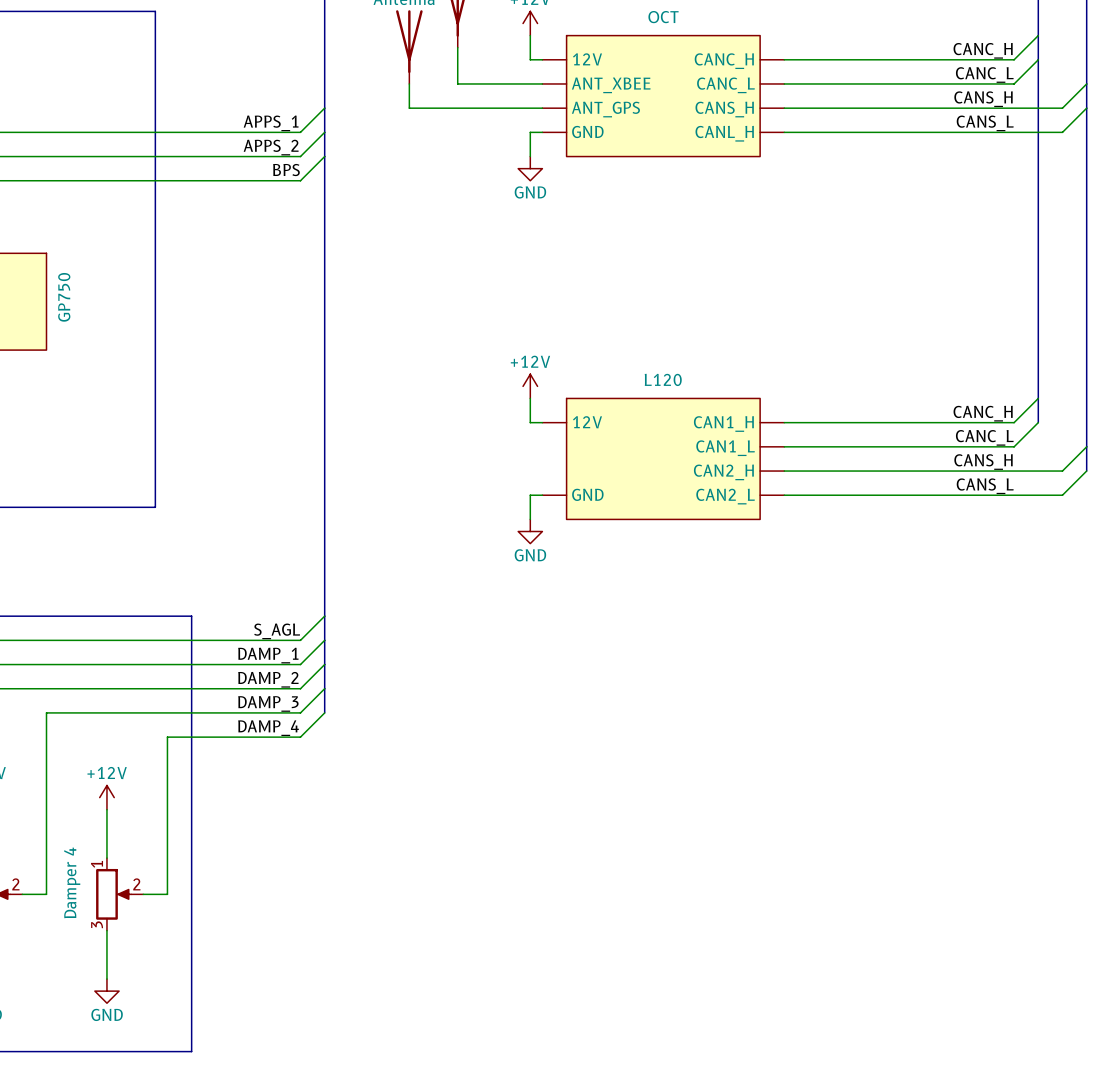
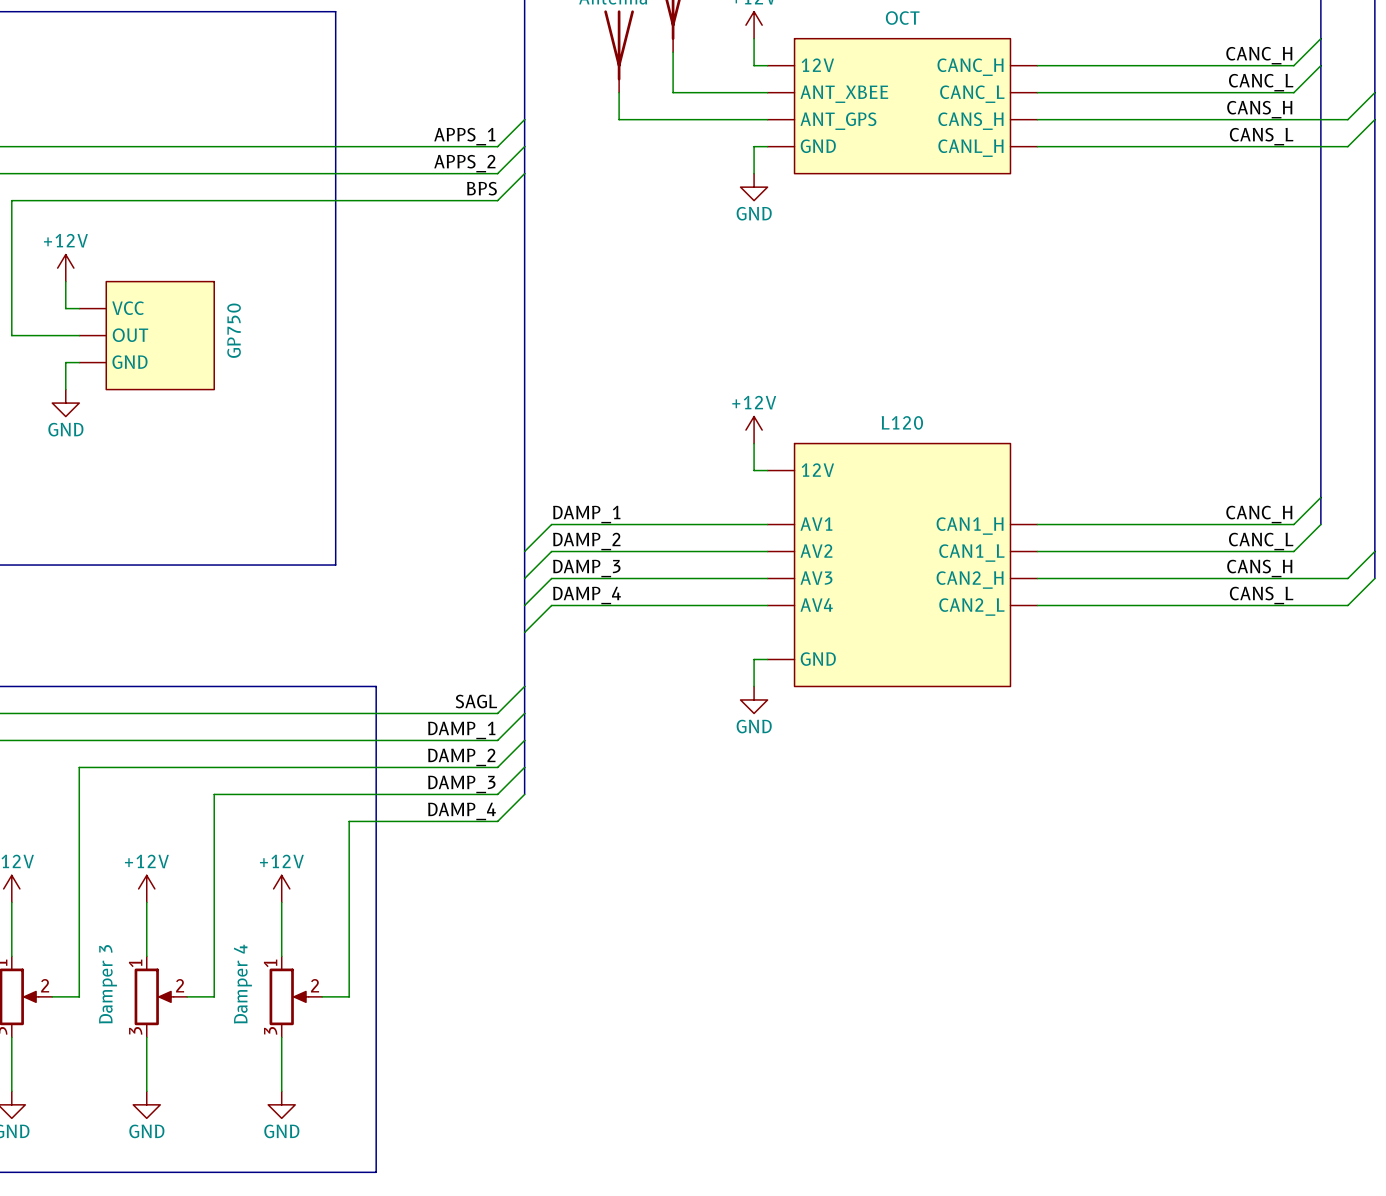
wire: (1038, 398) (1014, 422) (784, 422) -> none
label: CANC_H (983, 413) -> none
wire: (1038, 422) (1014, 446) (784, 446) -> none
bus: none -> (1320, 470) (1320, 524)
label: CANC_L (984, 437) -> none
wire: (1086, 446) (1062, 471) (1014, 471) -> (1320, 497) (1293, 524)
part: L120 (663, 458) -> none
label: none -> DAMP_1 (586, 514)
label: CANS_H (983, 462) -> CANC_H (1259, 514)
wire: none -> (767, 524) (551, 524) (524, 551)
wire: (1086, 471) (1062, 495) (1014, 495) -> (1320, 524) (1293, 551)
bus: none -> (1374, 524) (1374, 578)
label: none -> DAMP_2 (586, 541)
label: CANS_L (985, 486) -> CANC_L (1261, 541)
wire: (530, 495) (530, 519) -> (754, 551) (551, 551) (524, 578)
wire: none -> (1374, 551) (1347, 578) (1037, 578)
part: none -> L120 (902, 565)
label: none -> DAMP_3 (586, 568)
label: none -> CANS_H (1259, 568)
wire: none -> (767, 578) (551, 578) (524, 605)
wire: none -> (1374, 578) (1347, 605) (1037, 605)
power symbol position: GND (530, 531) -> GND (754, 699)
label: none -> DAMP_4 (587, 595)
label: none -> CANS_L (1261, 595)
wire: none -> (767, 605) (551, 605) (524, 632)
wire: none -> (767, 659) (754, 659) (754, 686)
label: S_AGL (277, 631) -> SAGL (476, 701)

